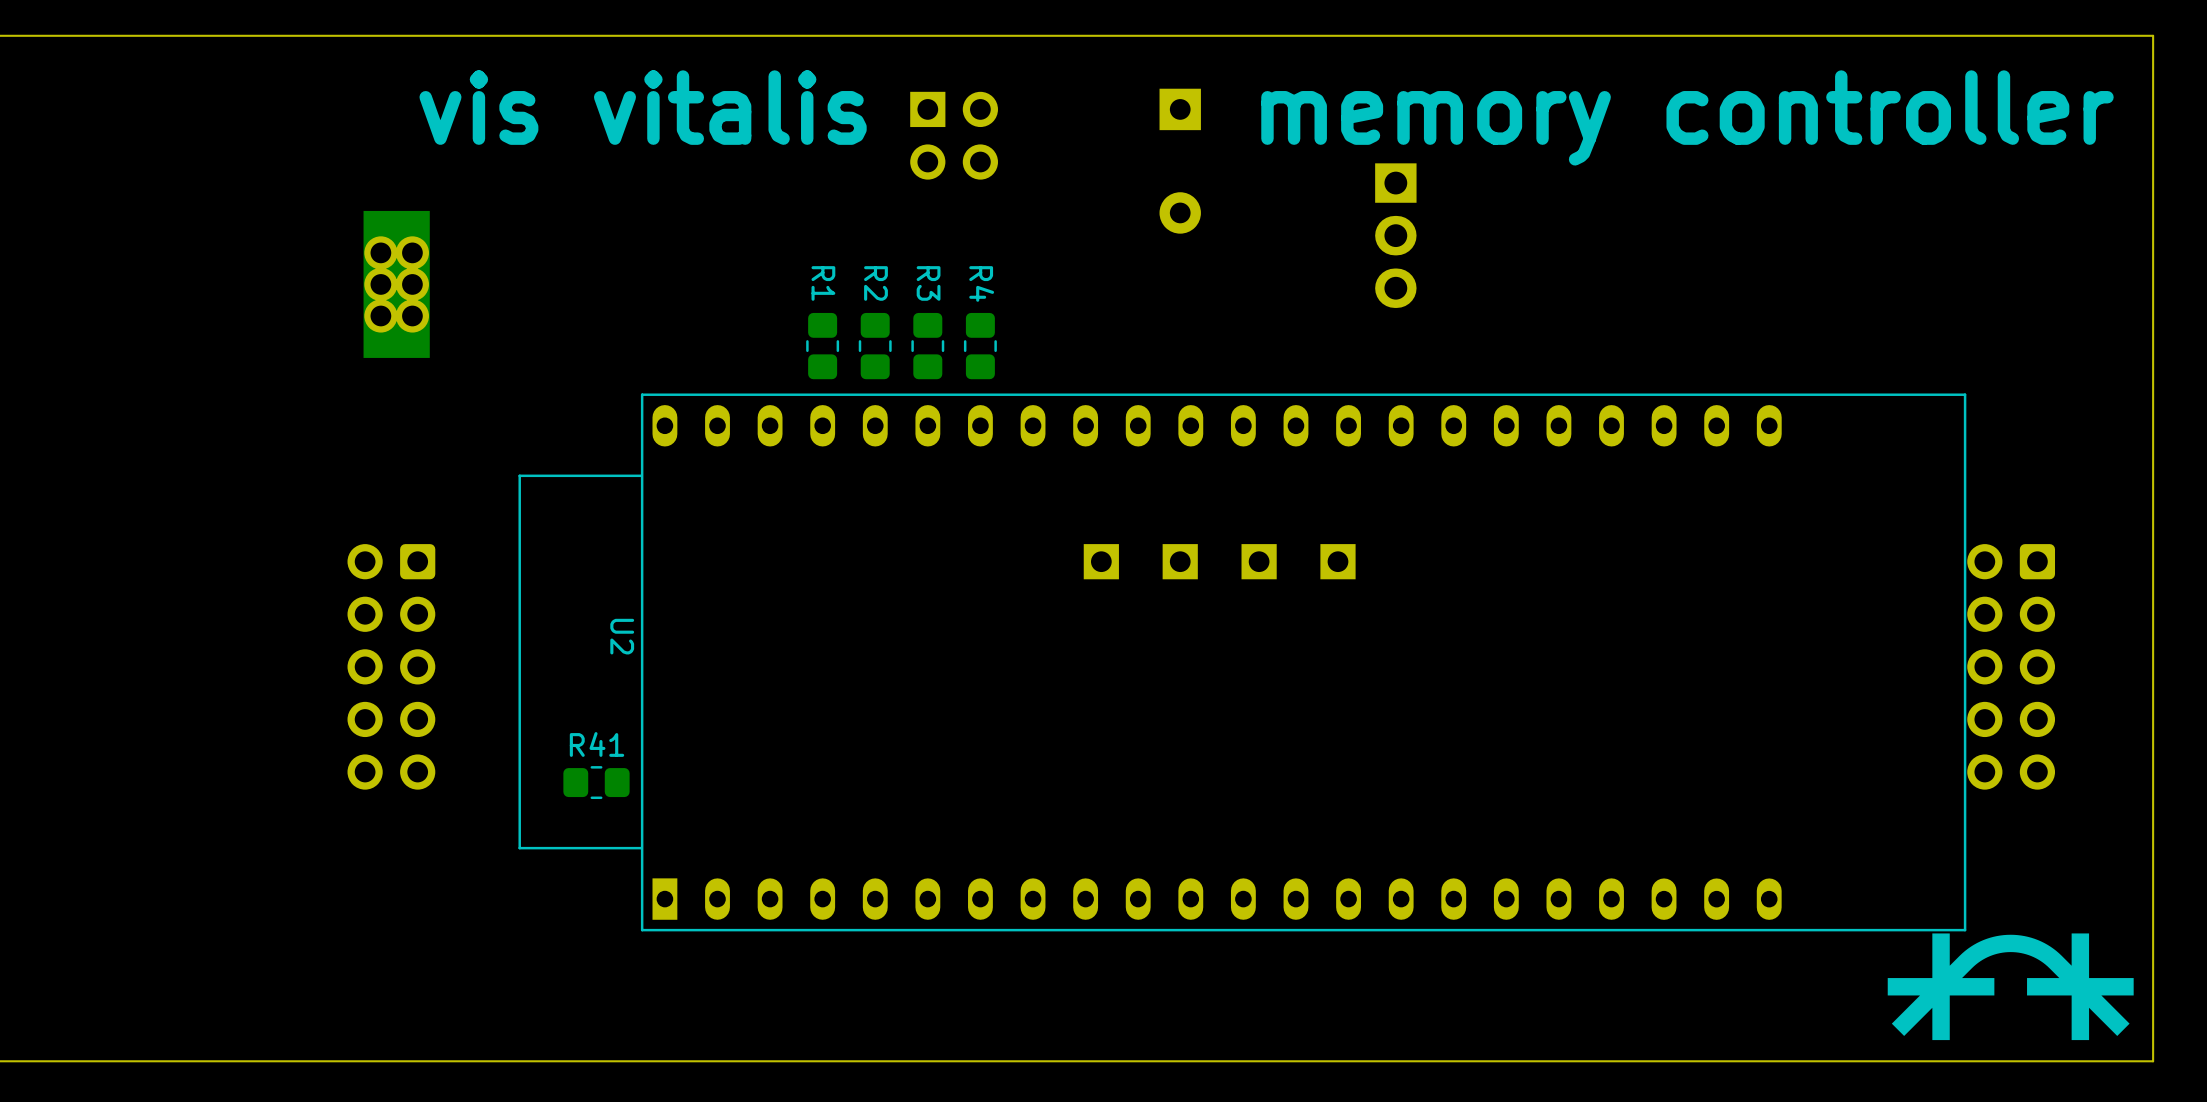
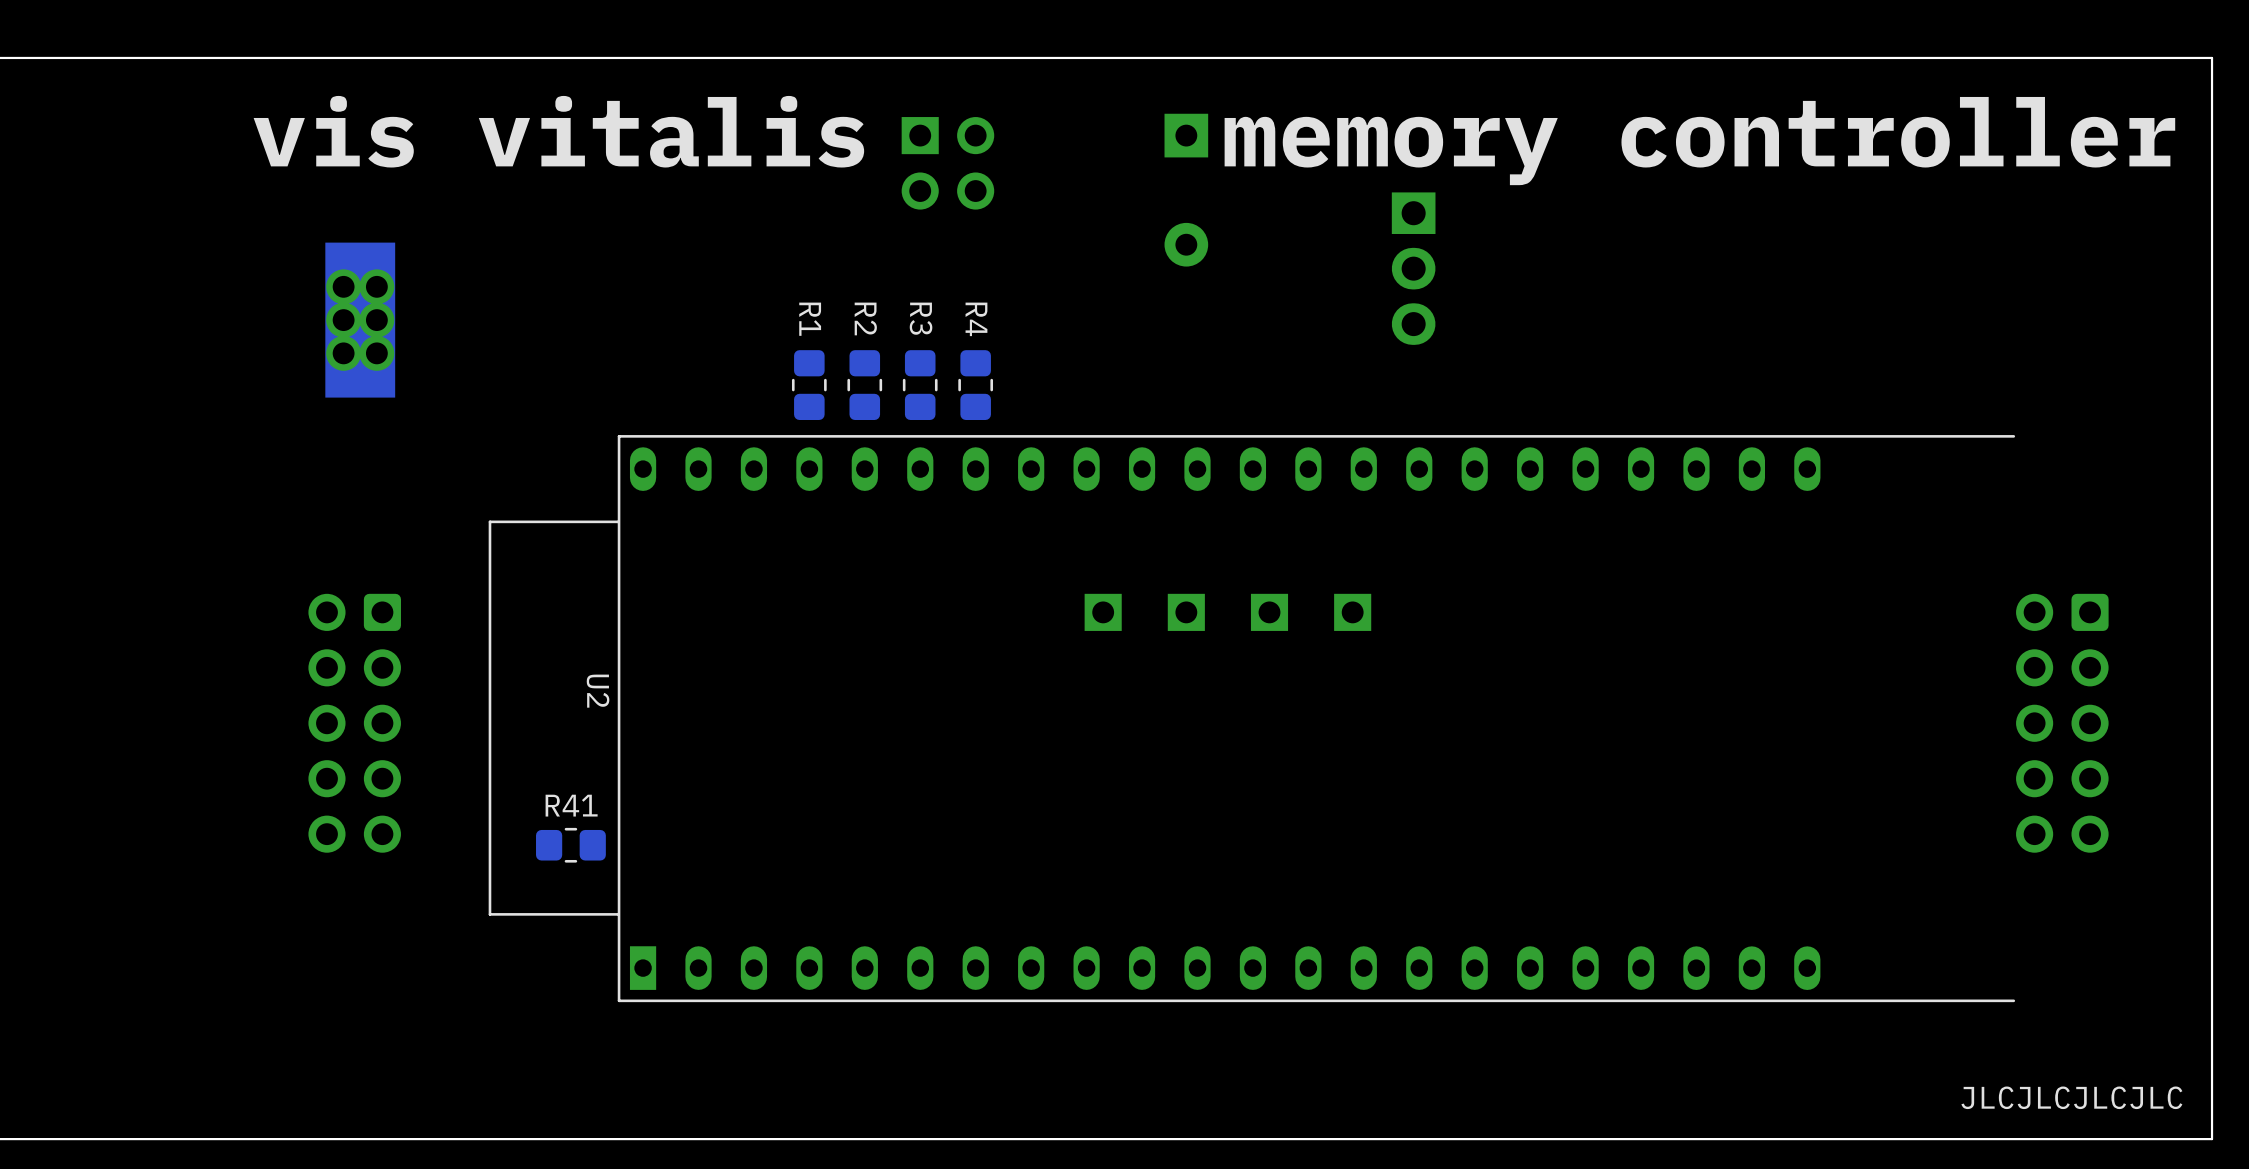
U2 footprint: [518, 393, 1967, 932] -> [488, 435, 2016, 1003]
drawing: [1887, 933, 2134, 1041] -> none
text: none -> JLCJLCJLCJLC (2071, 1097)

